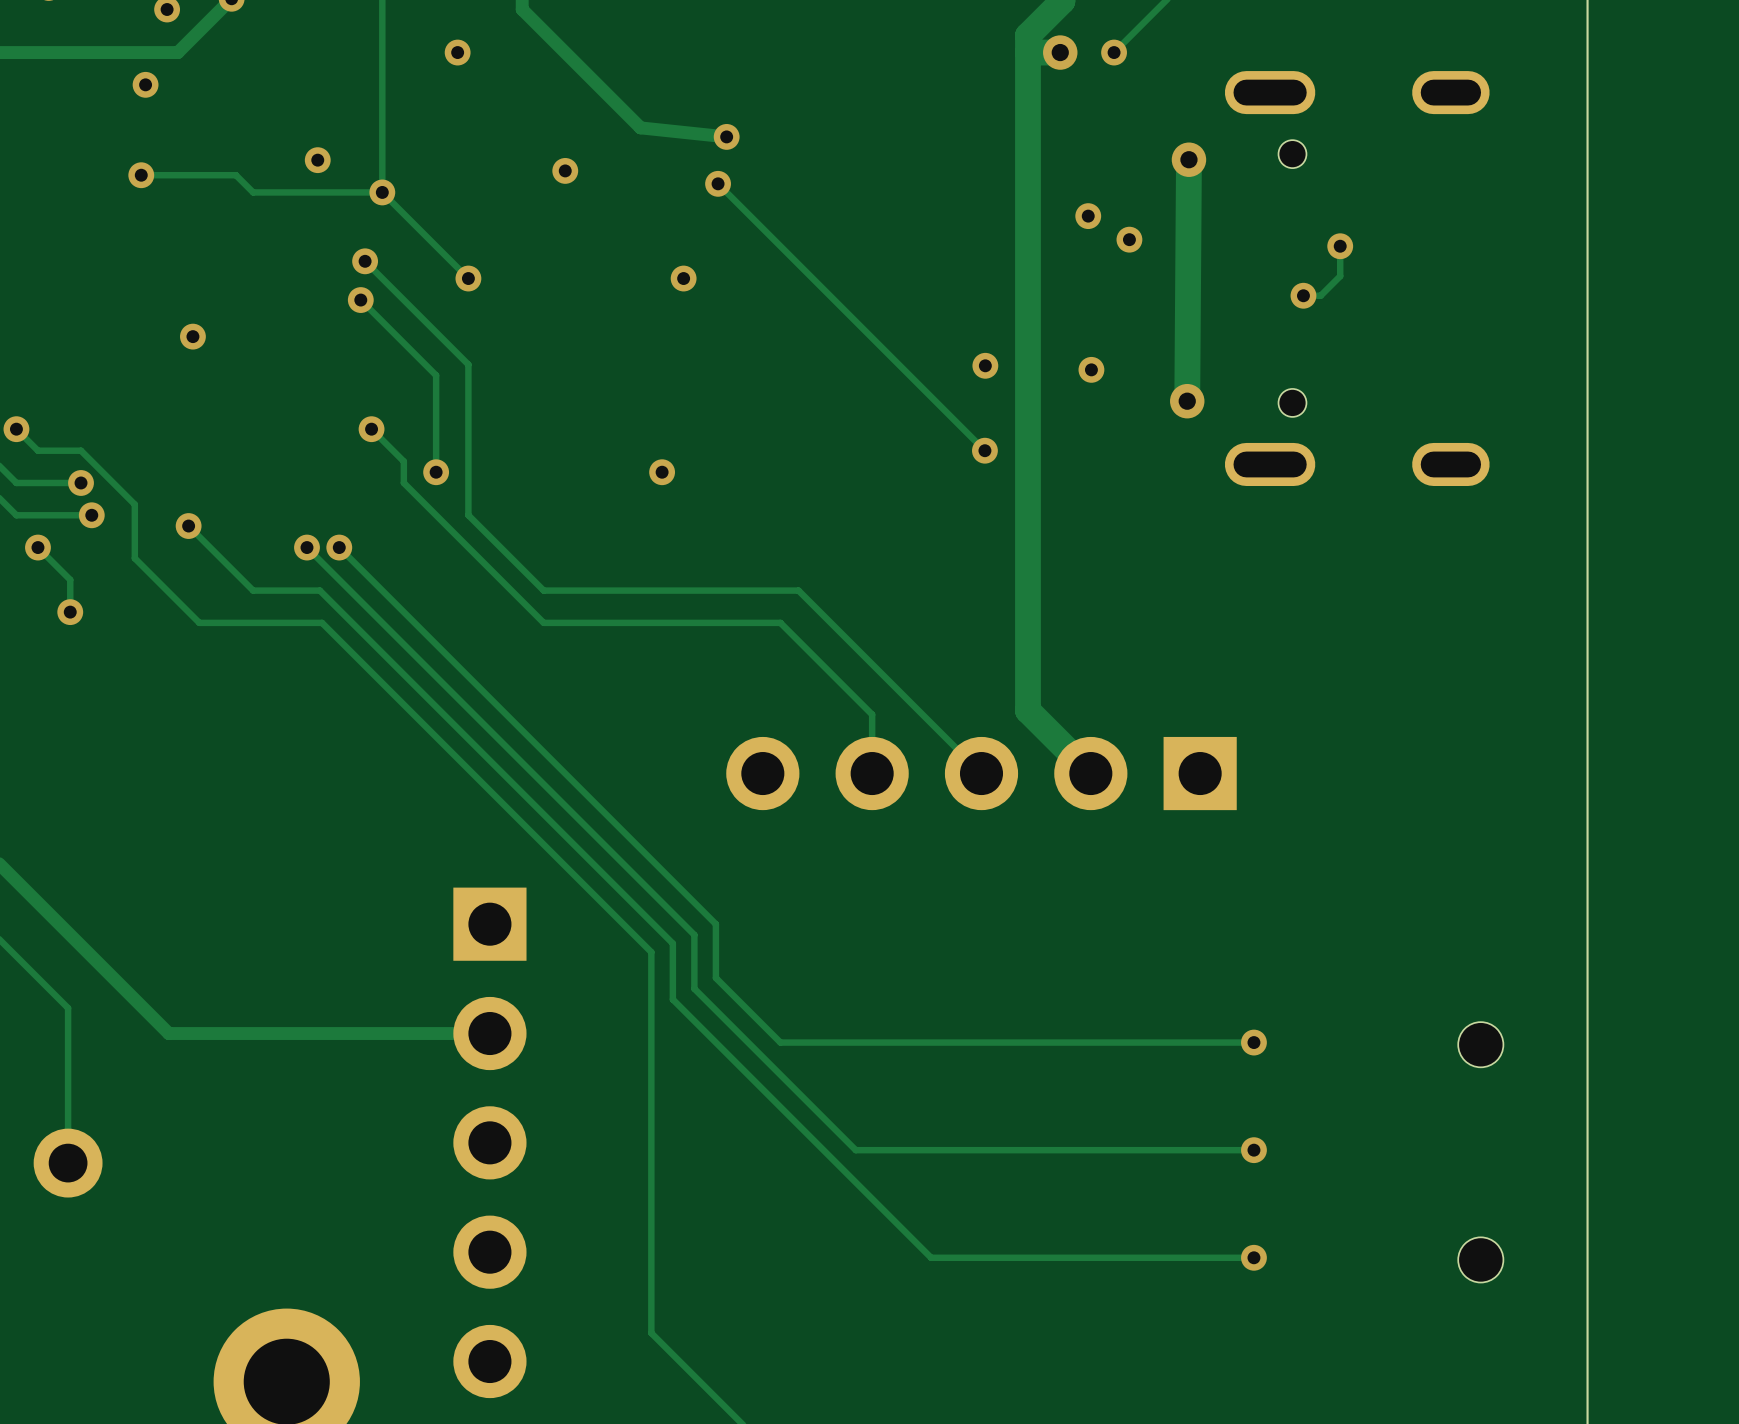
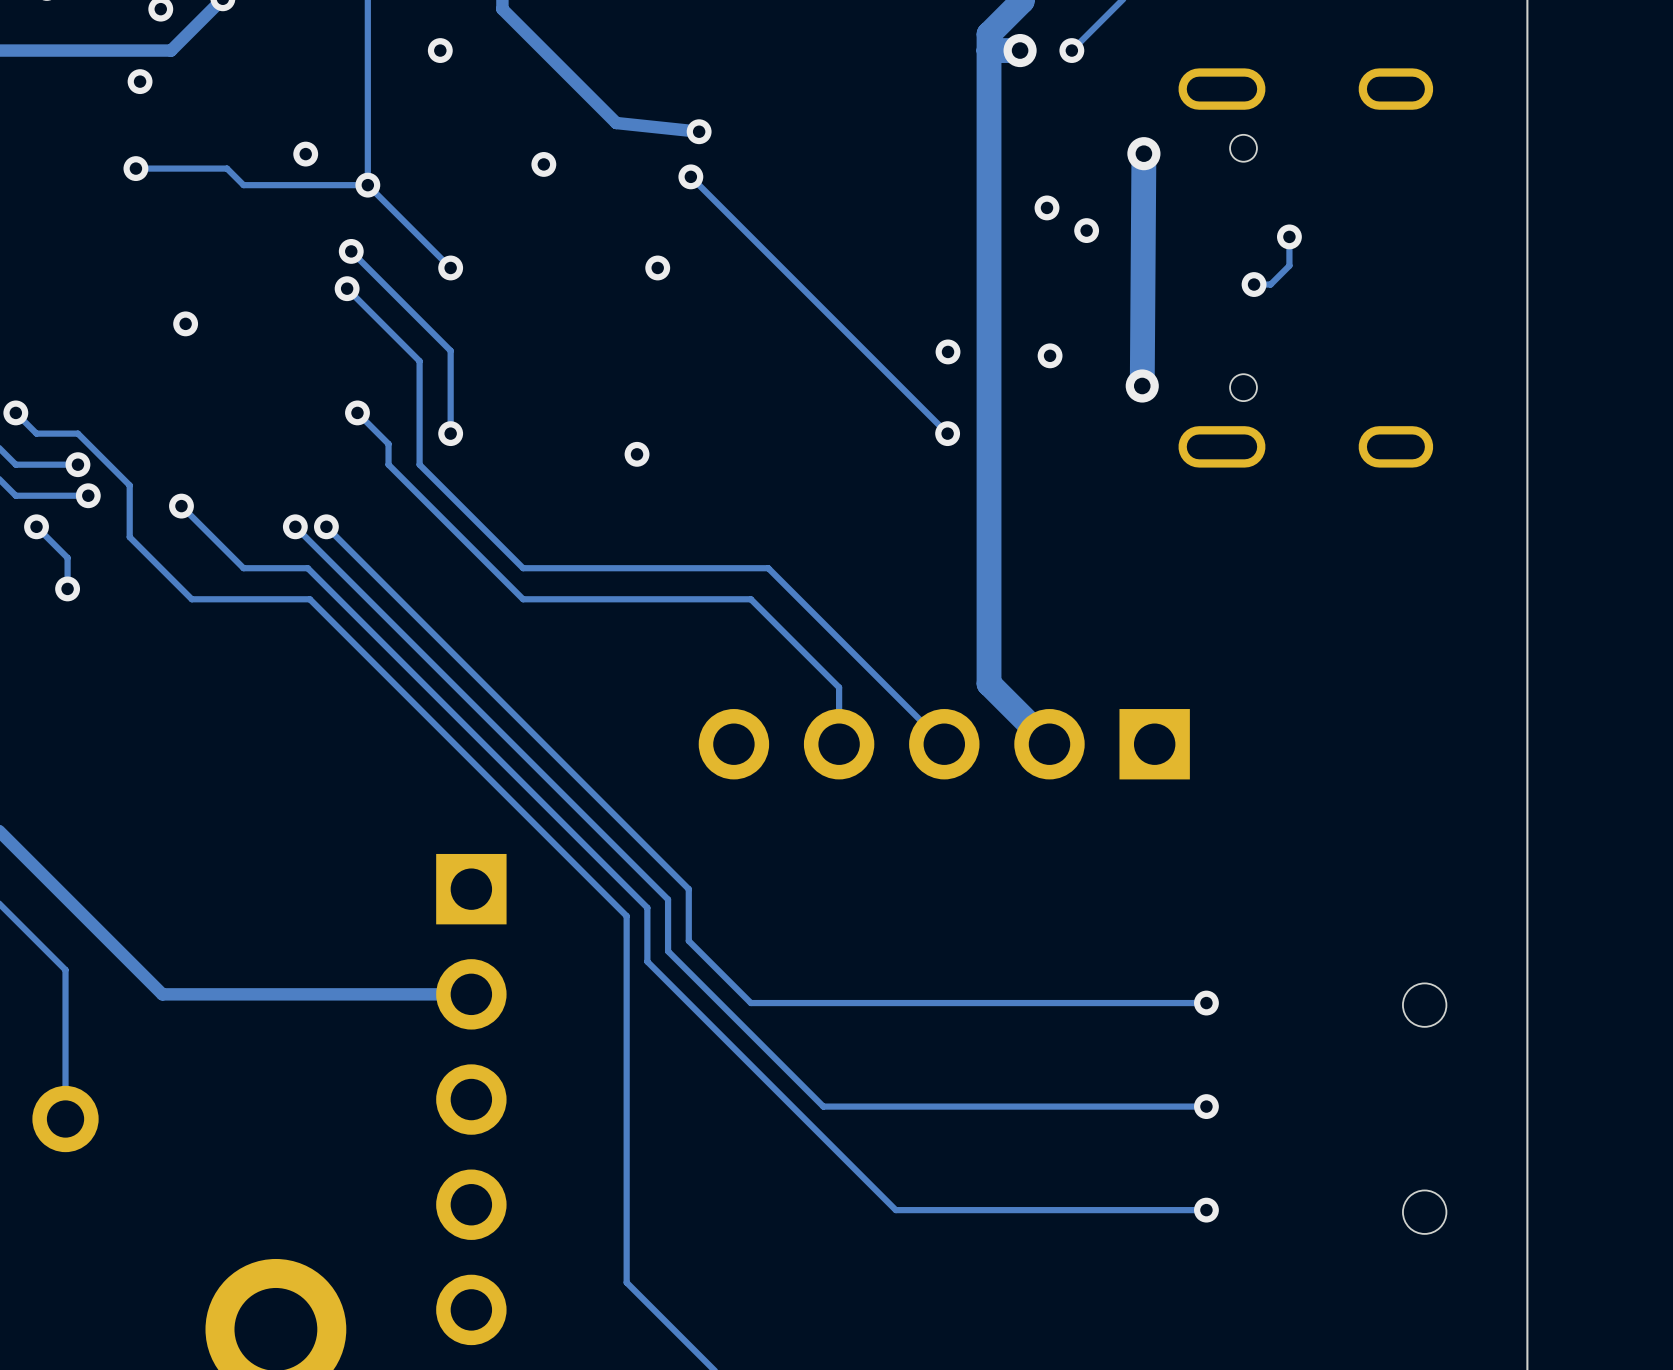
track: (468, 450) (468, 515) -> (419, 454) (419, 464) (450, 495)
via position: (436, 472) -> (450, 433)

